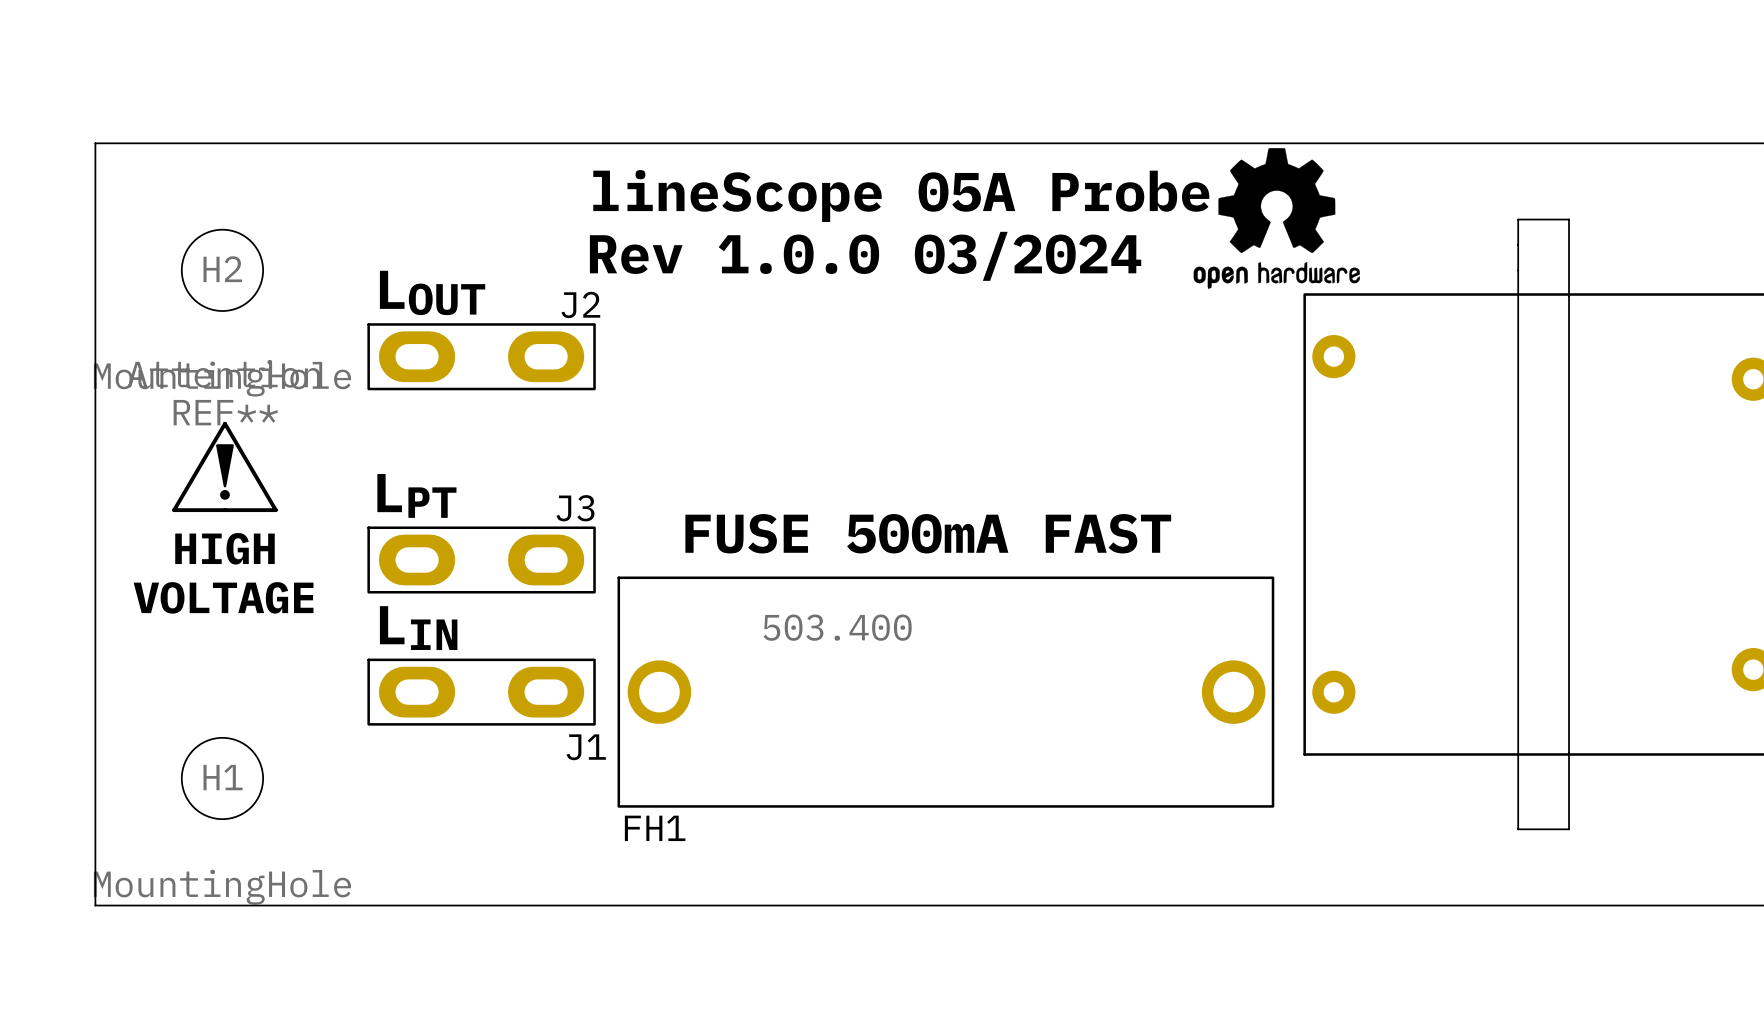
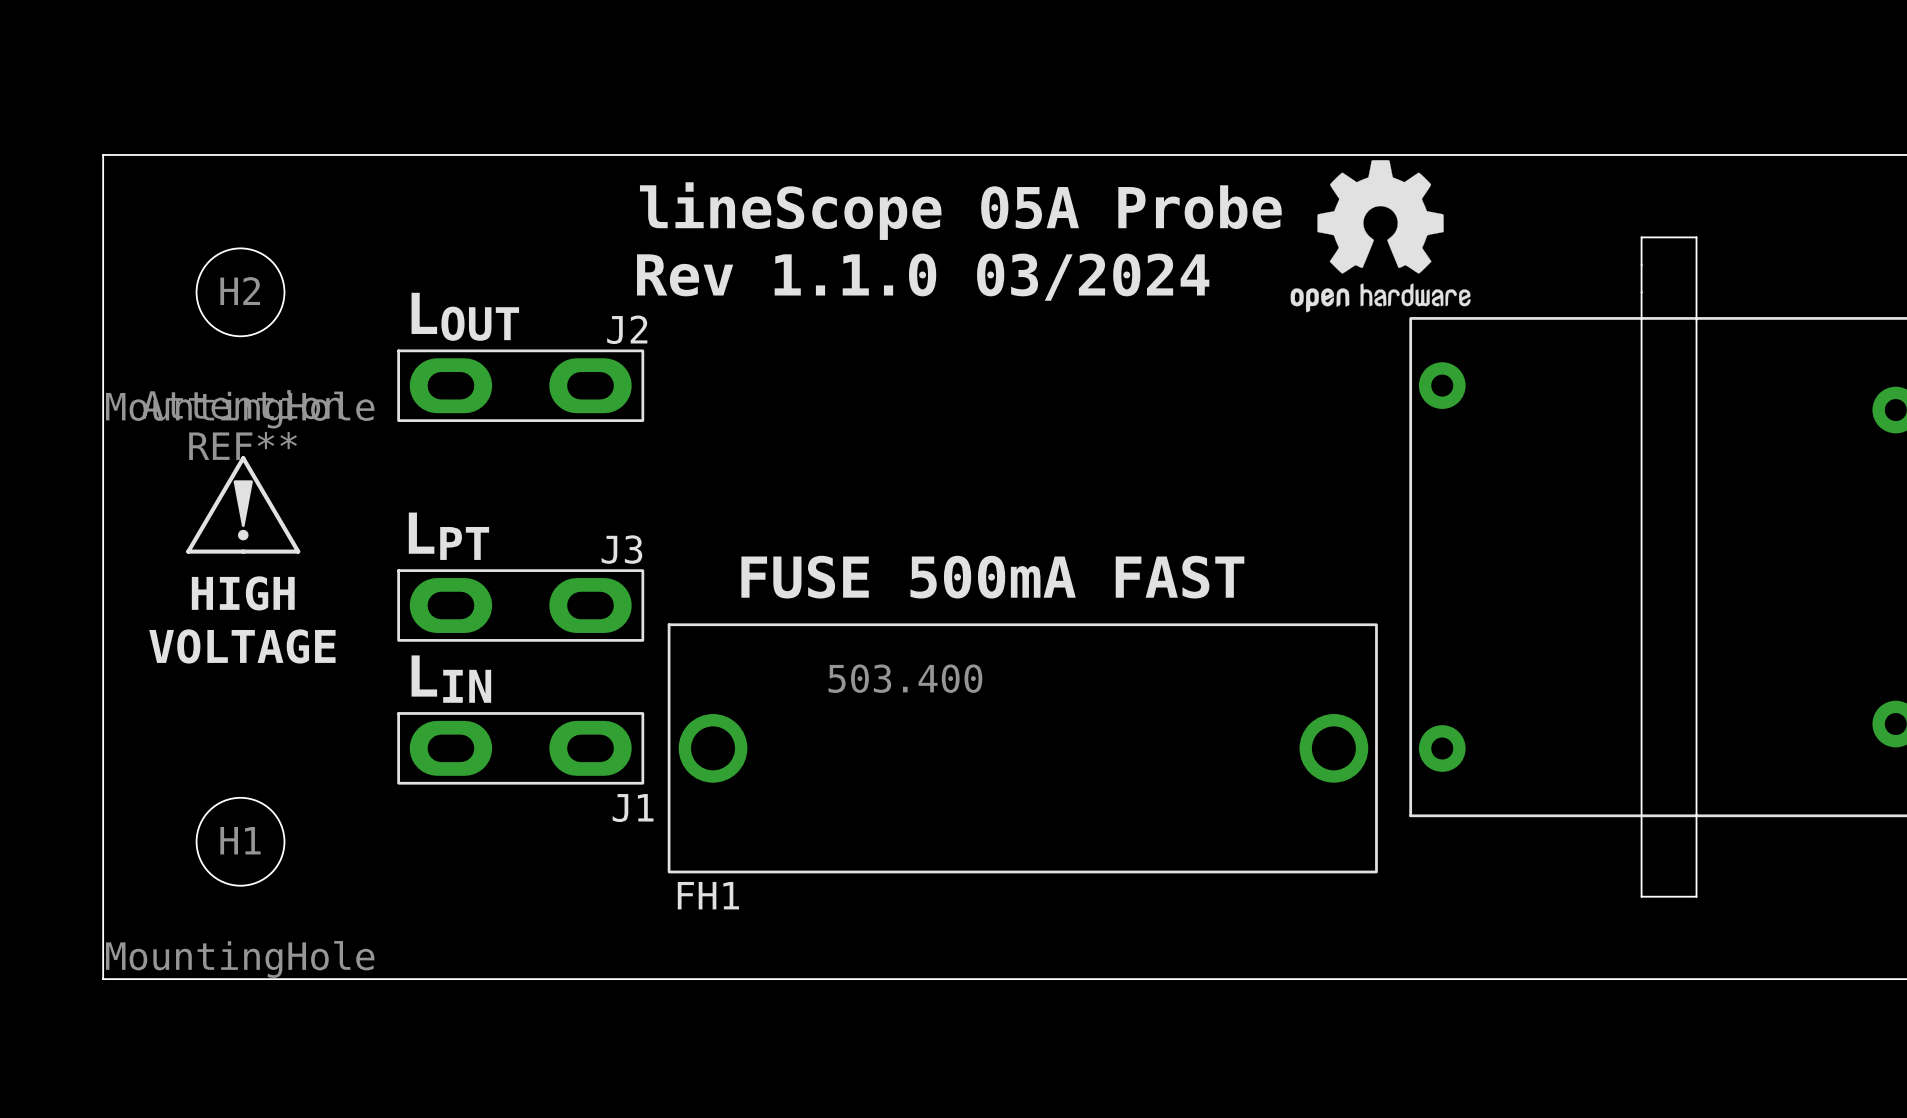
text: Rev 1.0.0 03/2024 (865, 256) -> Rev 1.1.0 03/2024 (923, 277)

